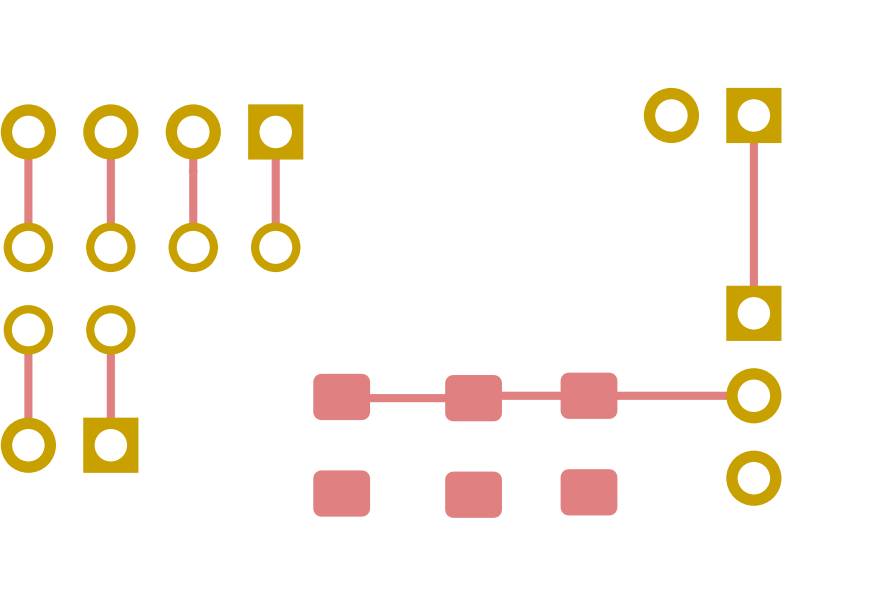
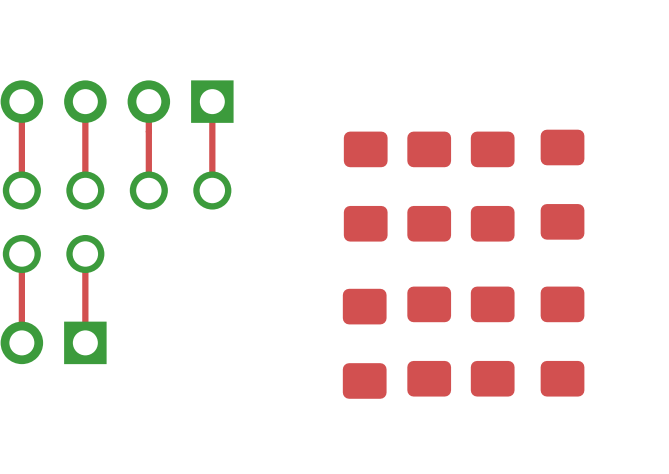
part: (712, 115) -> none
top track: (753, 115) (753, 313) -> none
part: none -> (562, 184)
part: none -> (365, 186)
part: none -> (429, 186)
part: none -> (492, 186)
top track: (753, 395) (475, 395) (473, 398) (341, 396) -> none
part: (753, 395) -> none
part: none -> (429, 341)
part: none -> (492, 341)
part: none -> (562, 341)
part: (588, 444) -> none
part: (341, 445) -> none

